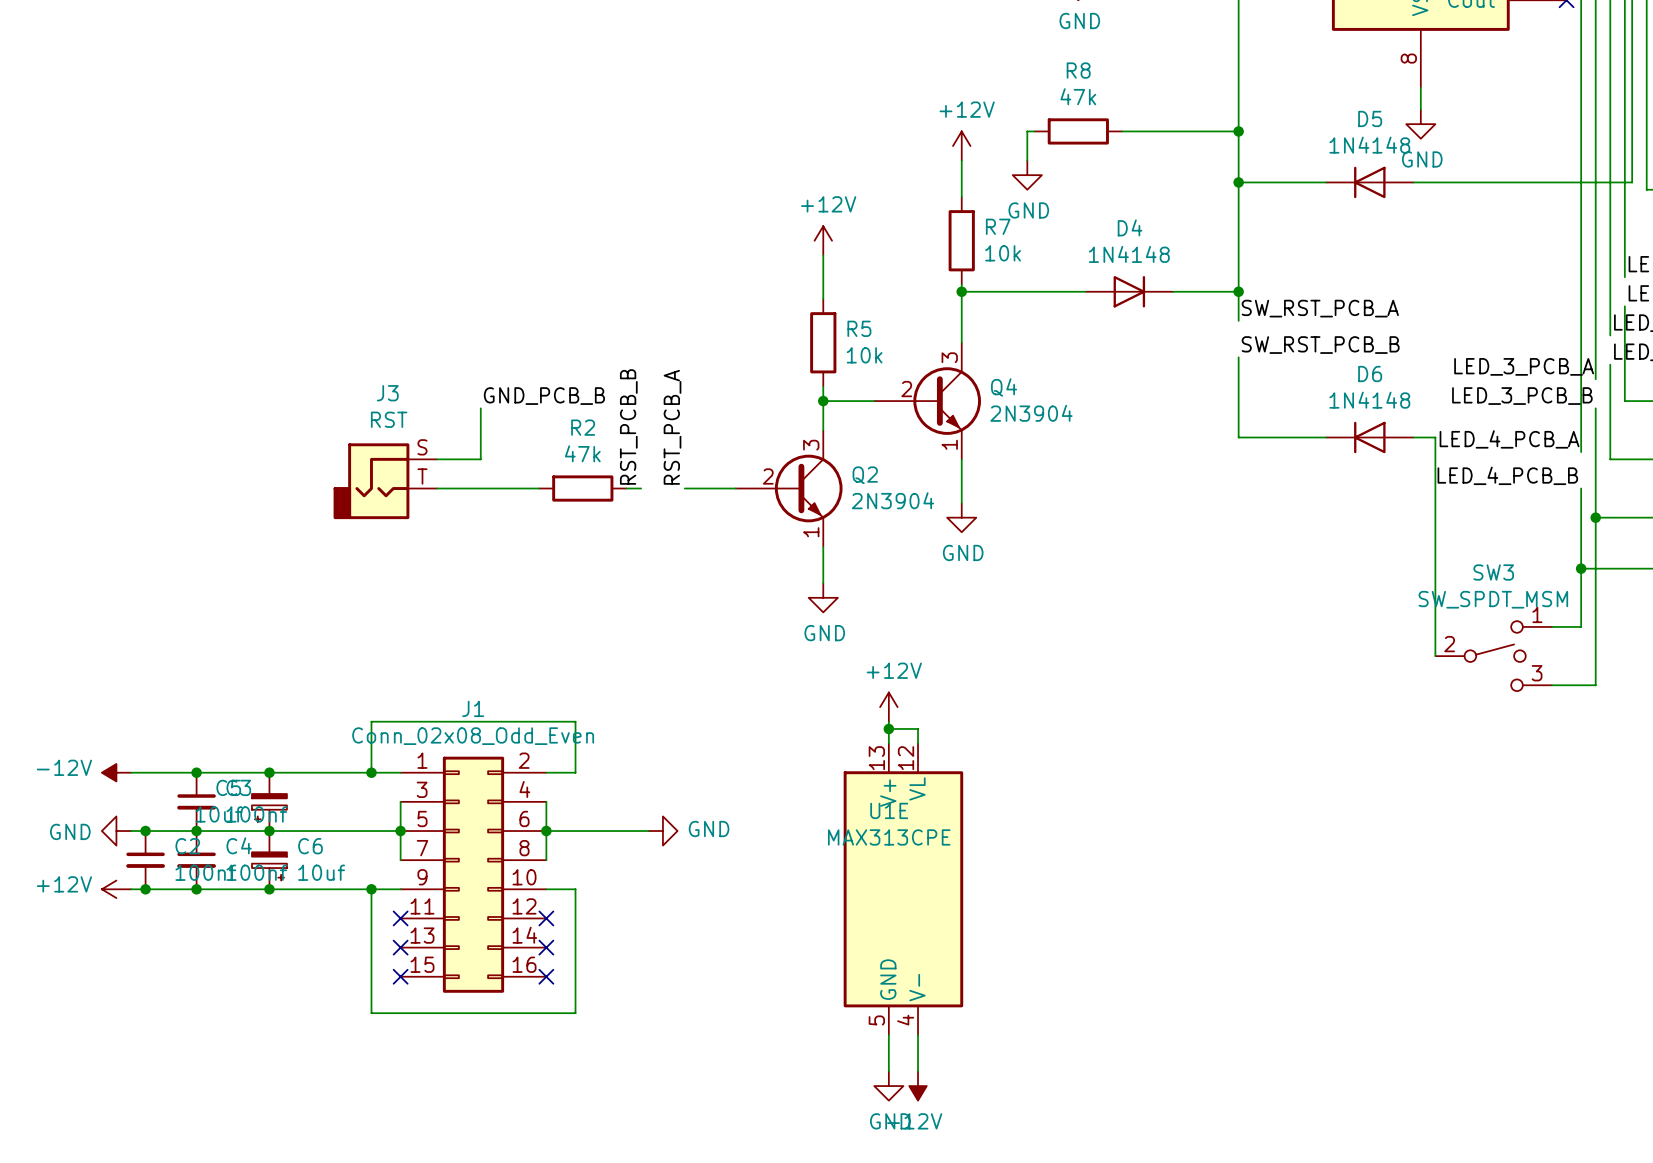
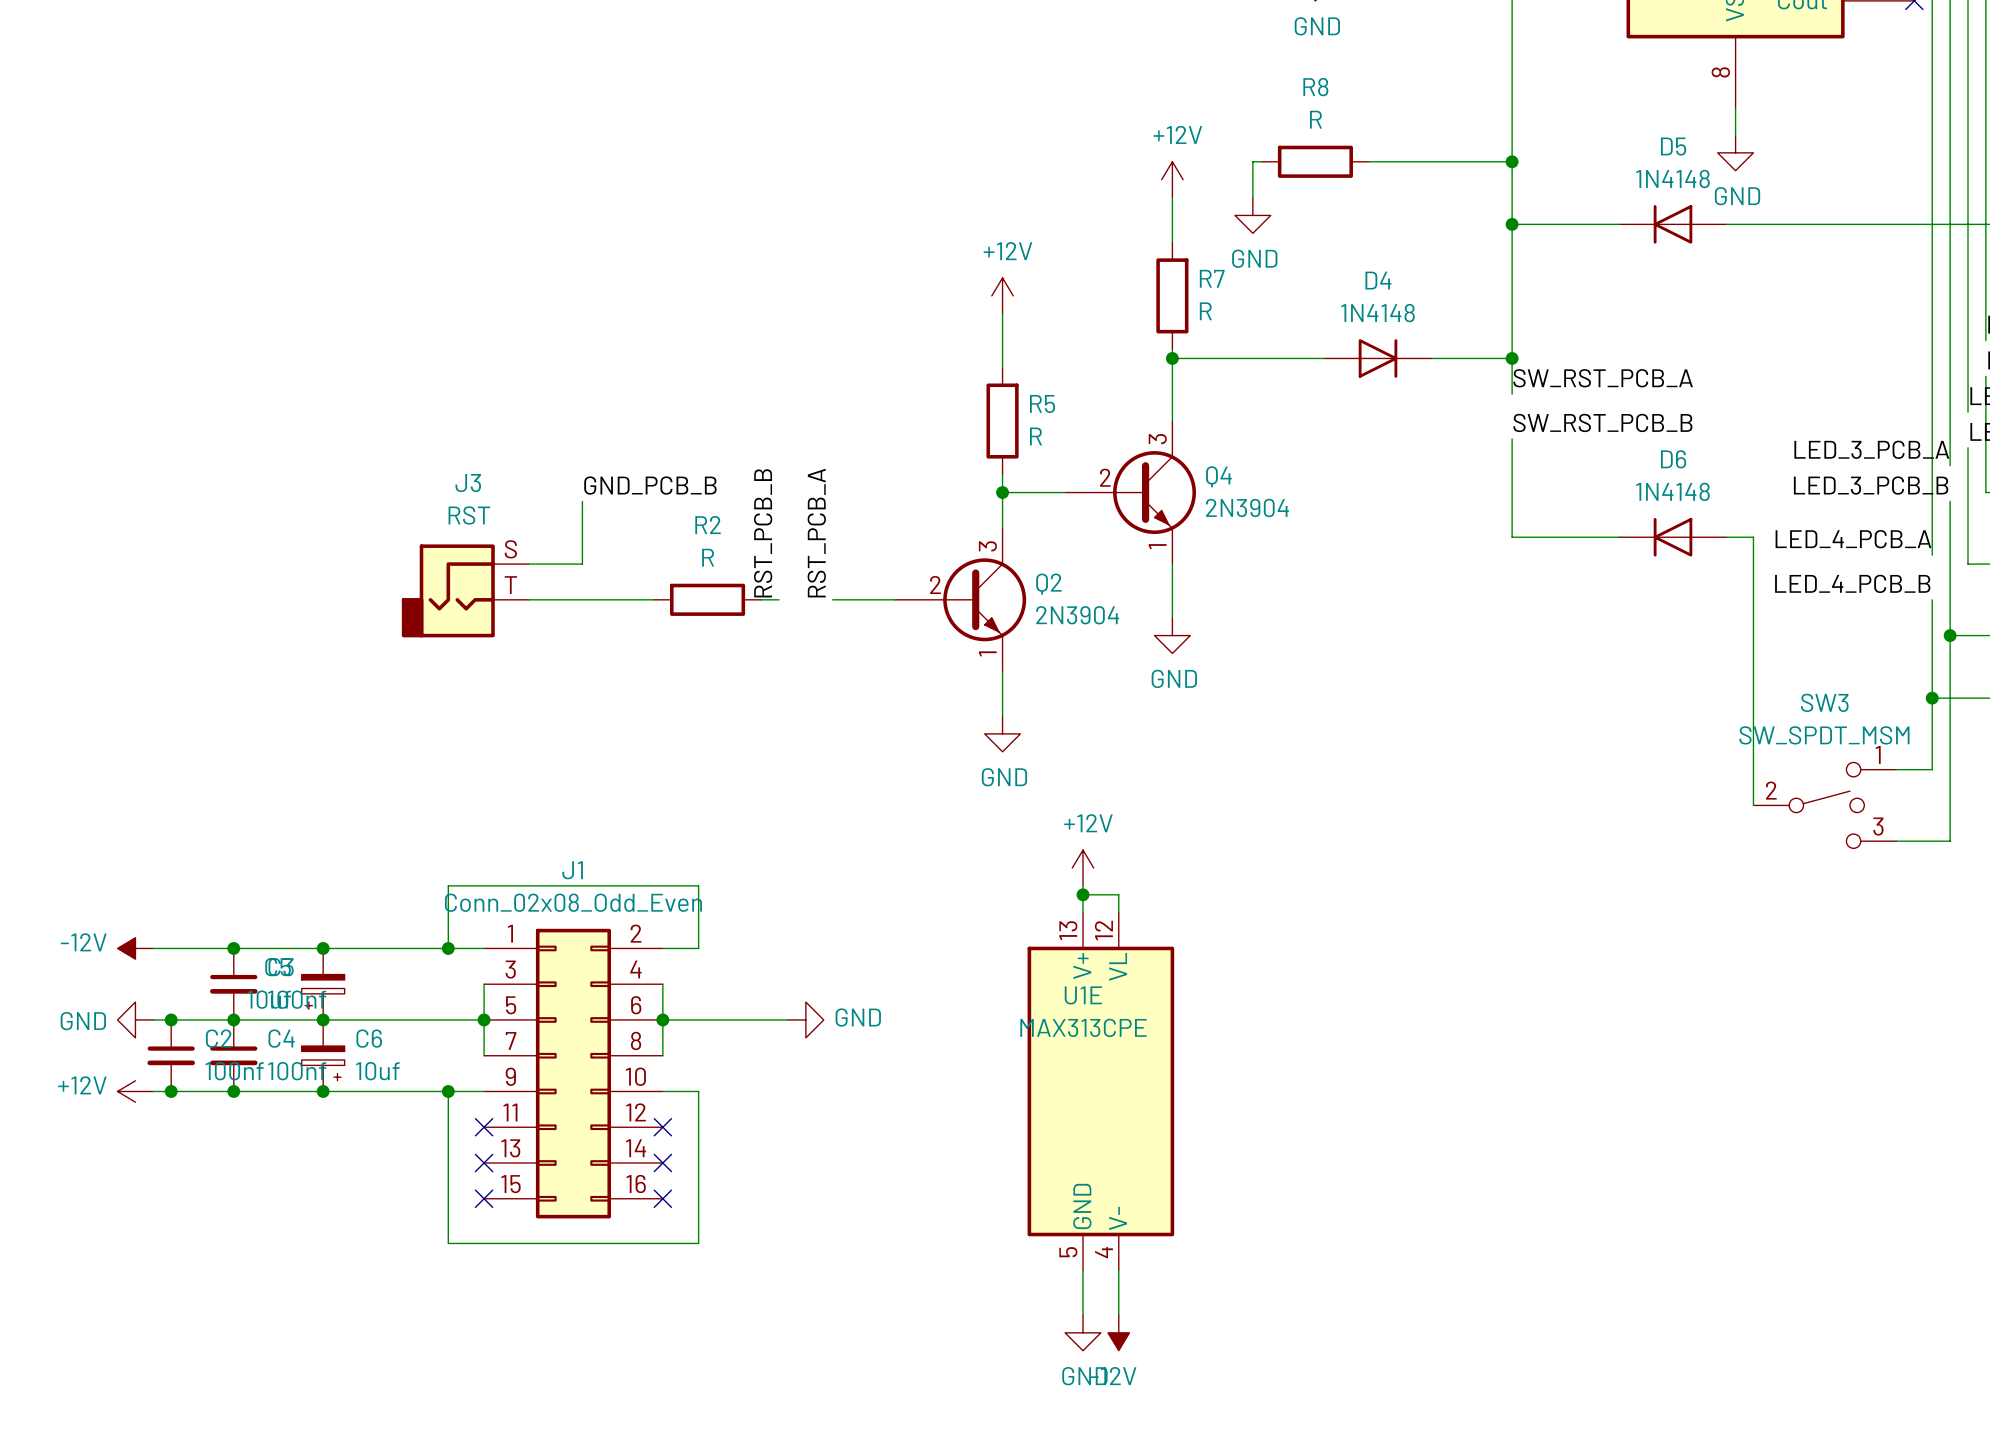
R8 value: 47k (1078, 96) -> R (1316, 119)
R7 value: 10k (1003, 253) -> R (1205, 311)
R5 value: 10k (864, 355) -> R (1035, 436)
R2 value: 47k (582, 453) -> R (708, 557)

